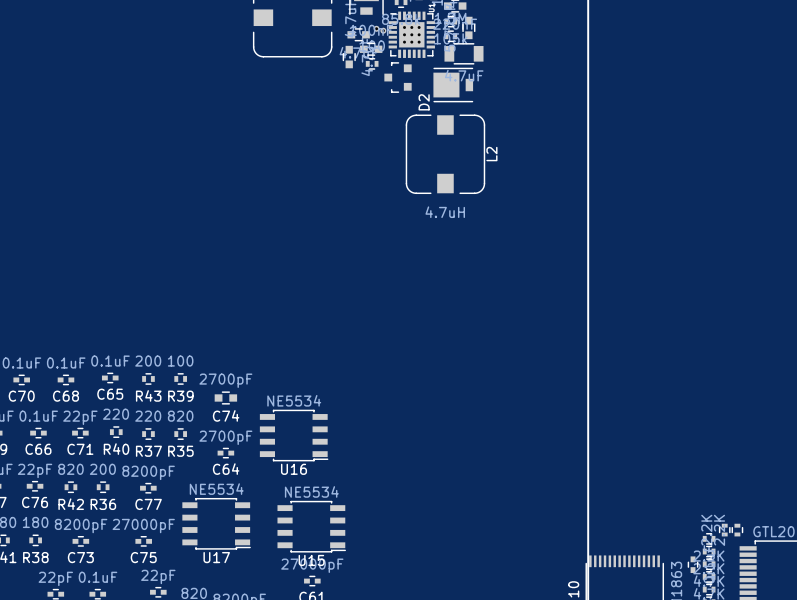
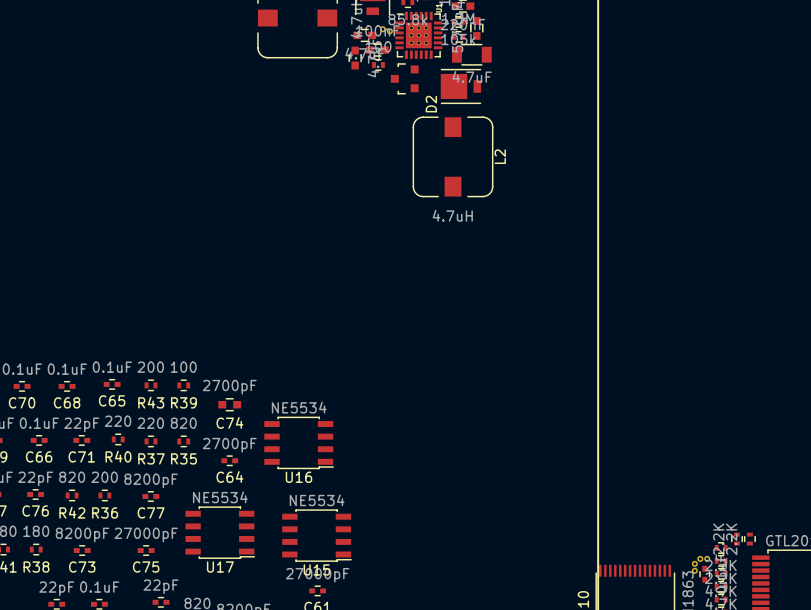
part: none -> (700, 558)
part: none -> (707, 558)
part: none -> (694, 563)
part: none -> (694, 570)

